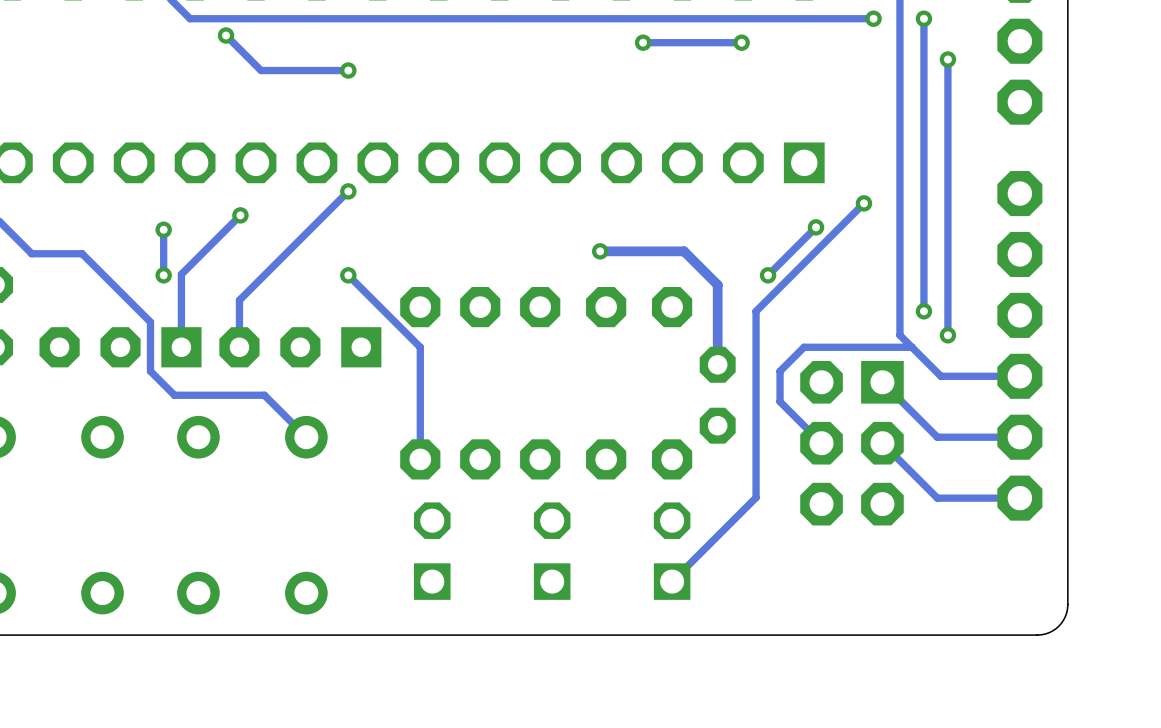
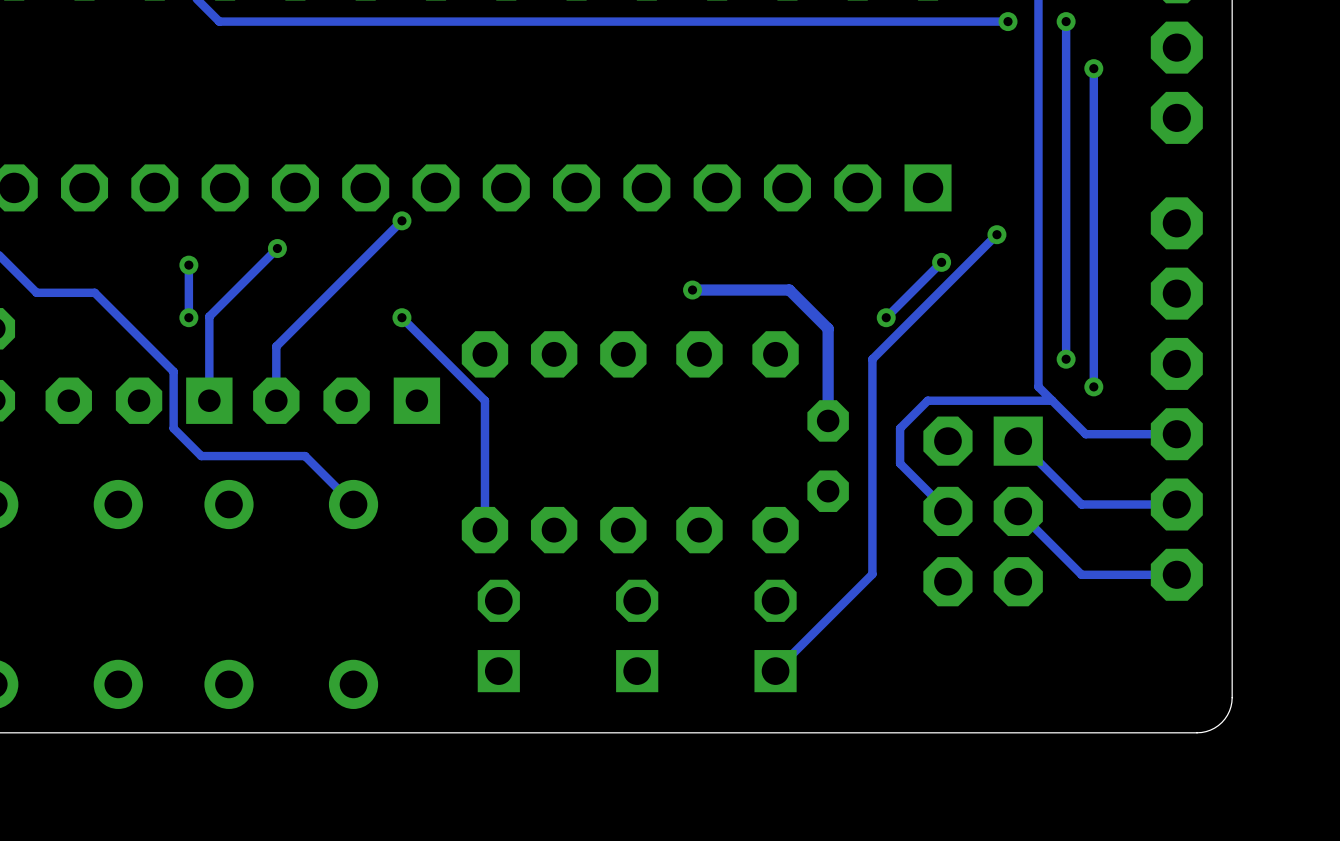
track: (226, 35) (261, 70) (348, 70) -> none
via: (226, 35) -> none
via: (643, 42) -> none
track: (741, 42) (643, 42) -> none
via: (741, 42) -> none
via: (348, 70) -> none

